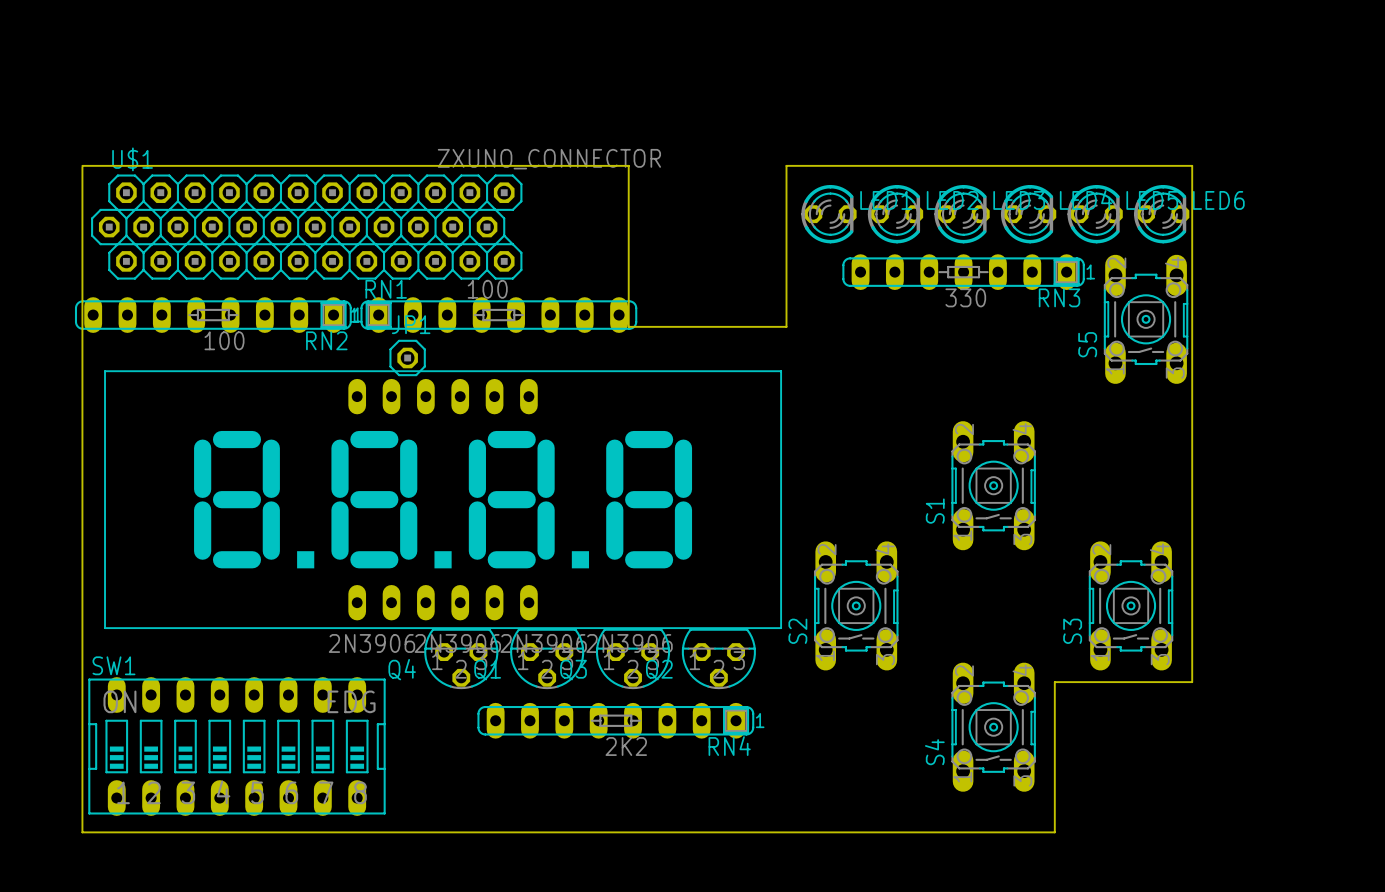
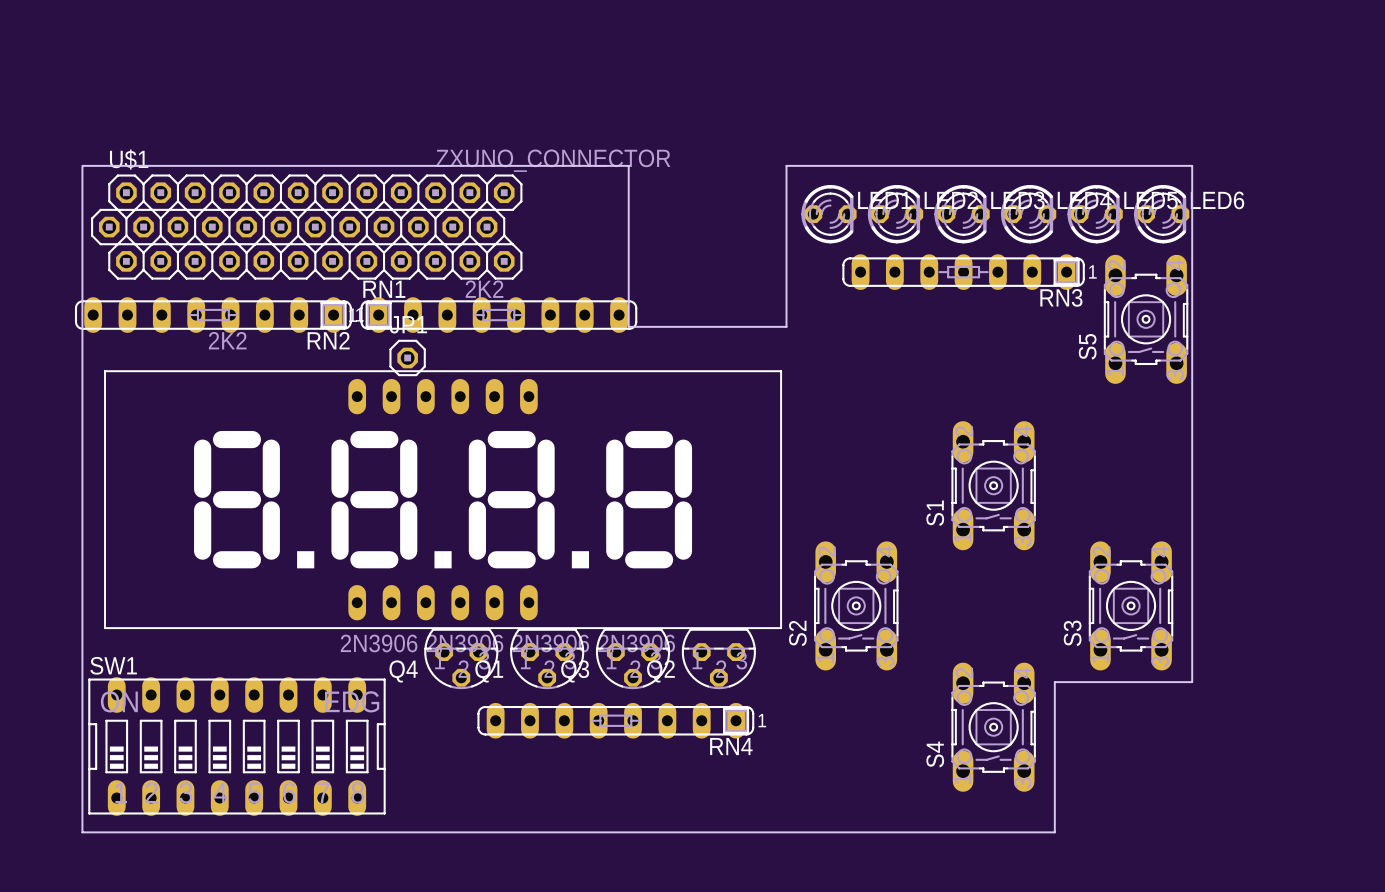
RN1 value: 100 (487, 289) -> 2K2 (484, 289)
RN3 value: 330 (965, 297) -> none
RN2 value: 100 (224, 340) -> 2K2 (227, 340)
RN4 value: 2K2 (626, 746) -> none

